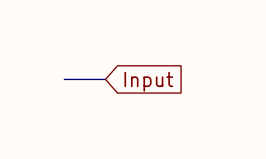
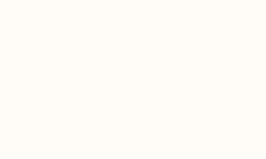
wire: (64, 79) (105, 79) -> none
global label: Input (148, 81) -> none

